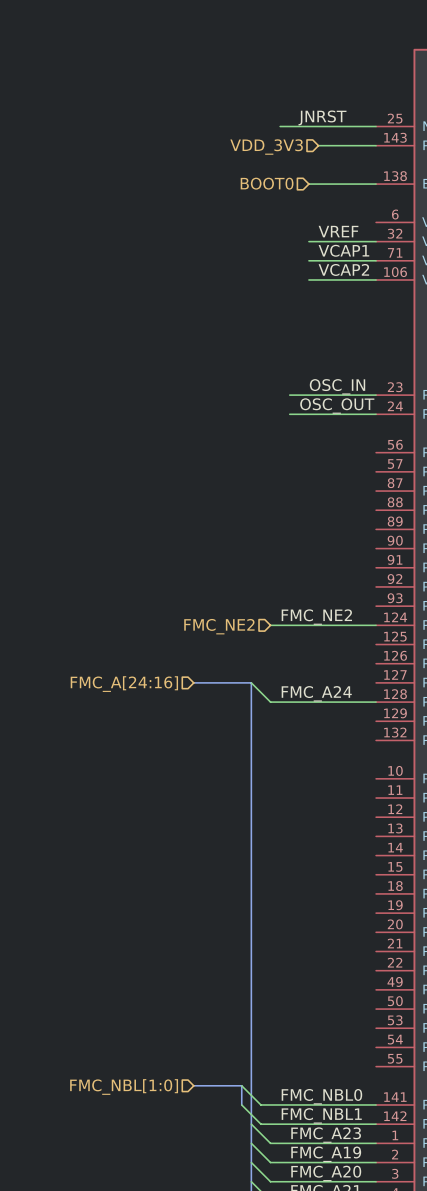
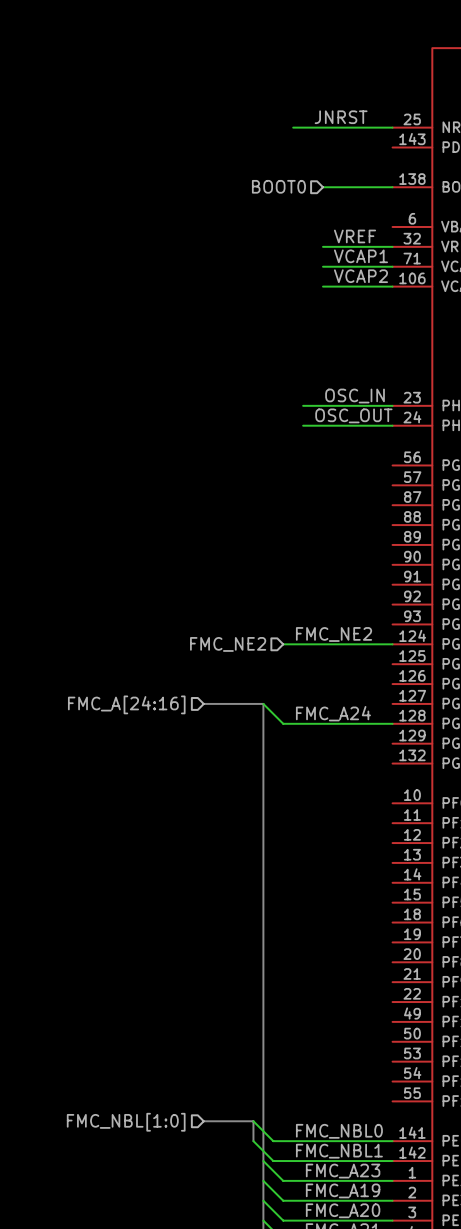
wire: (318, 145) (376, 145) -> none
hierarchical label: VDD_3V3 (266, 147) -> none

